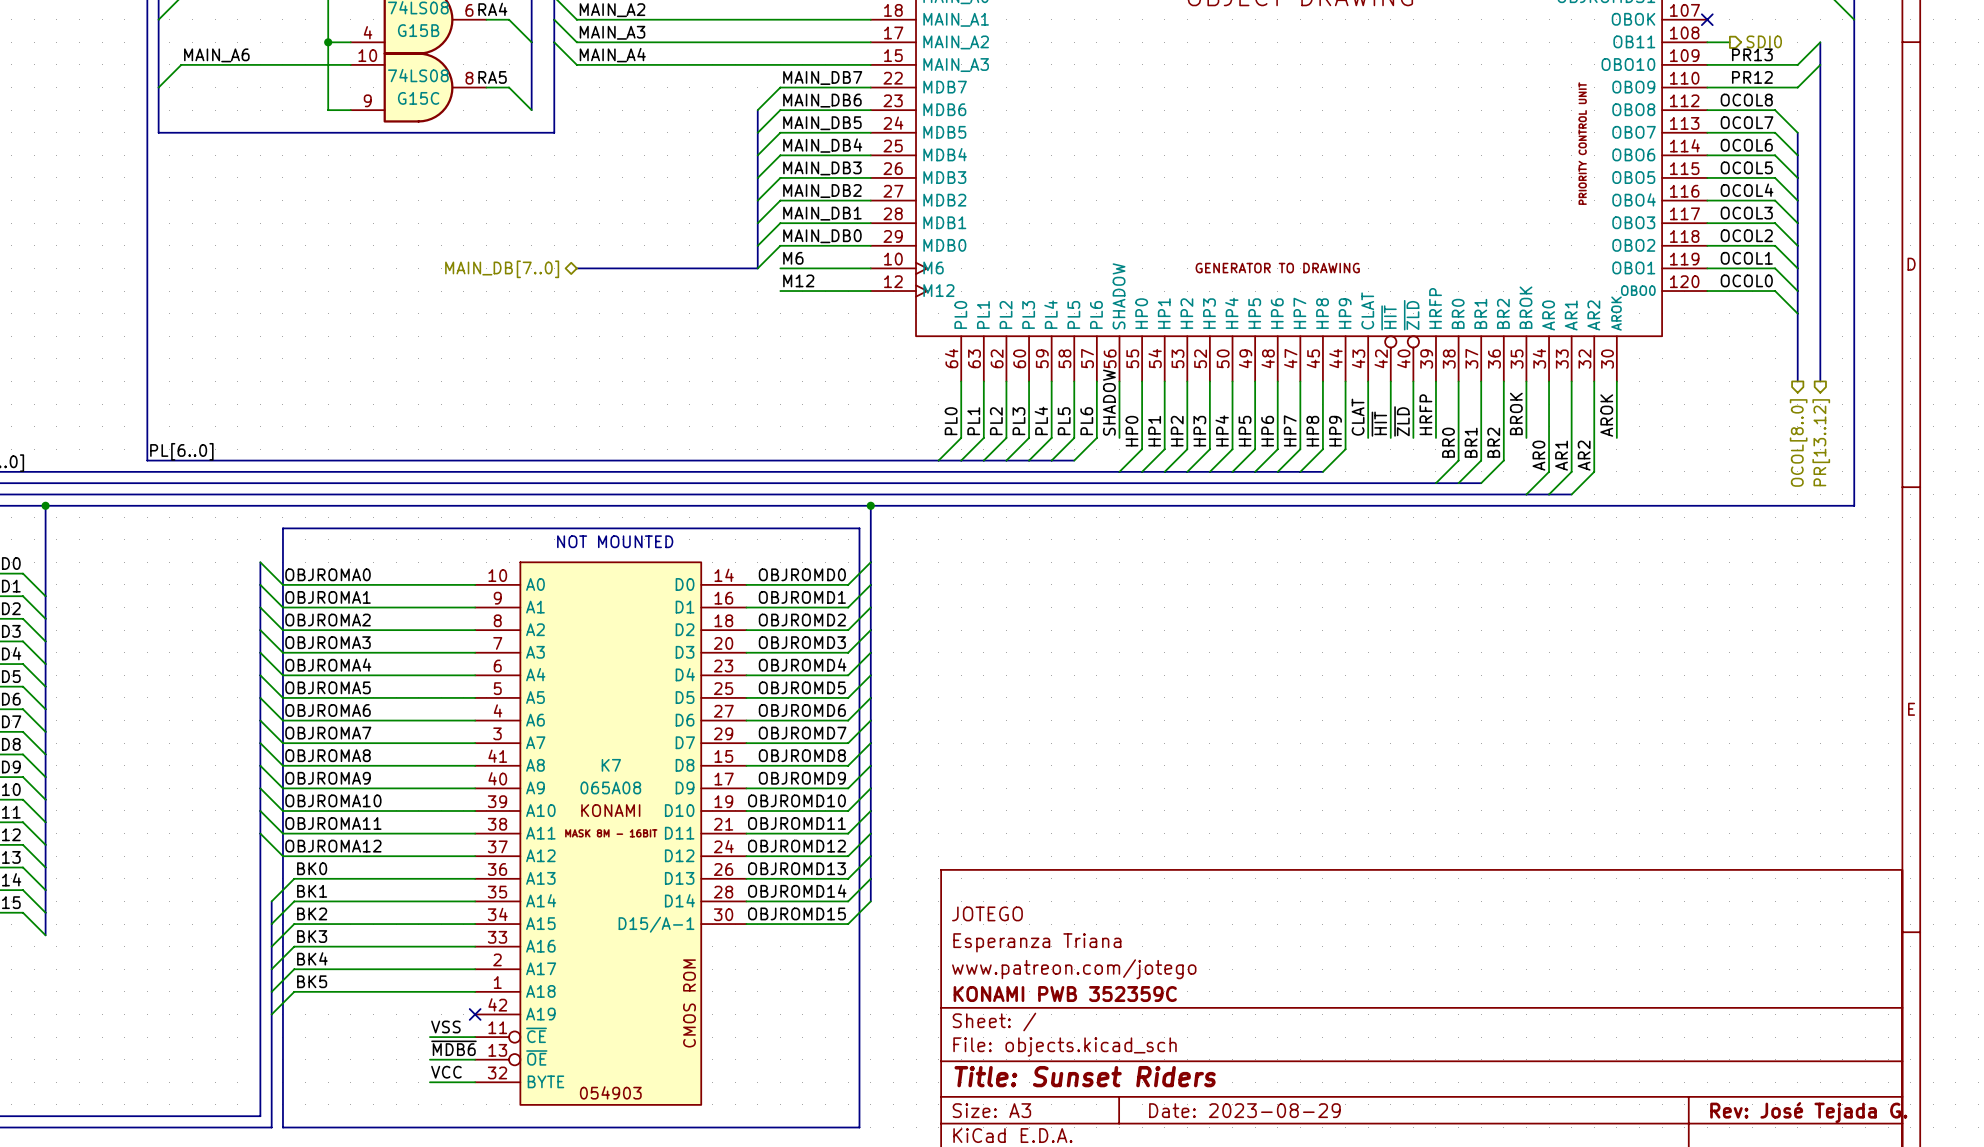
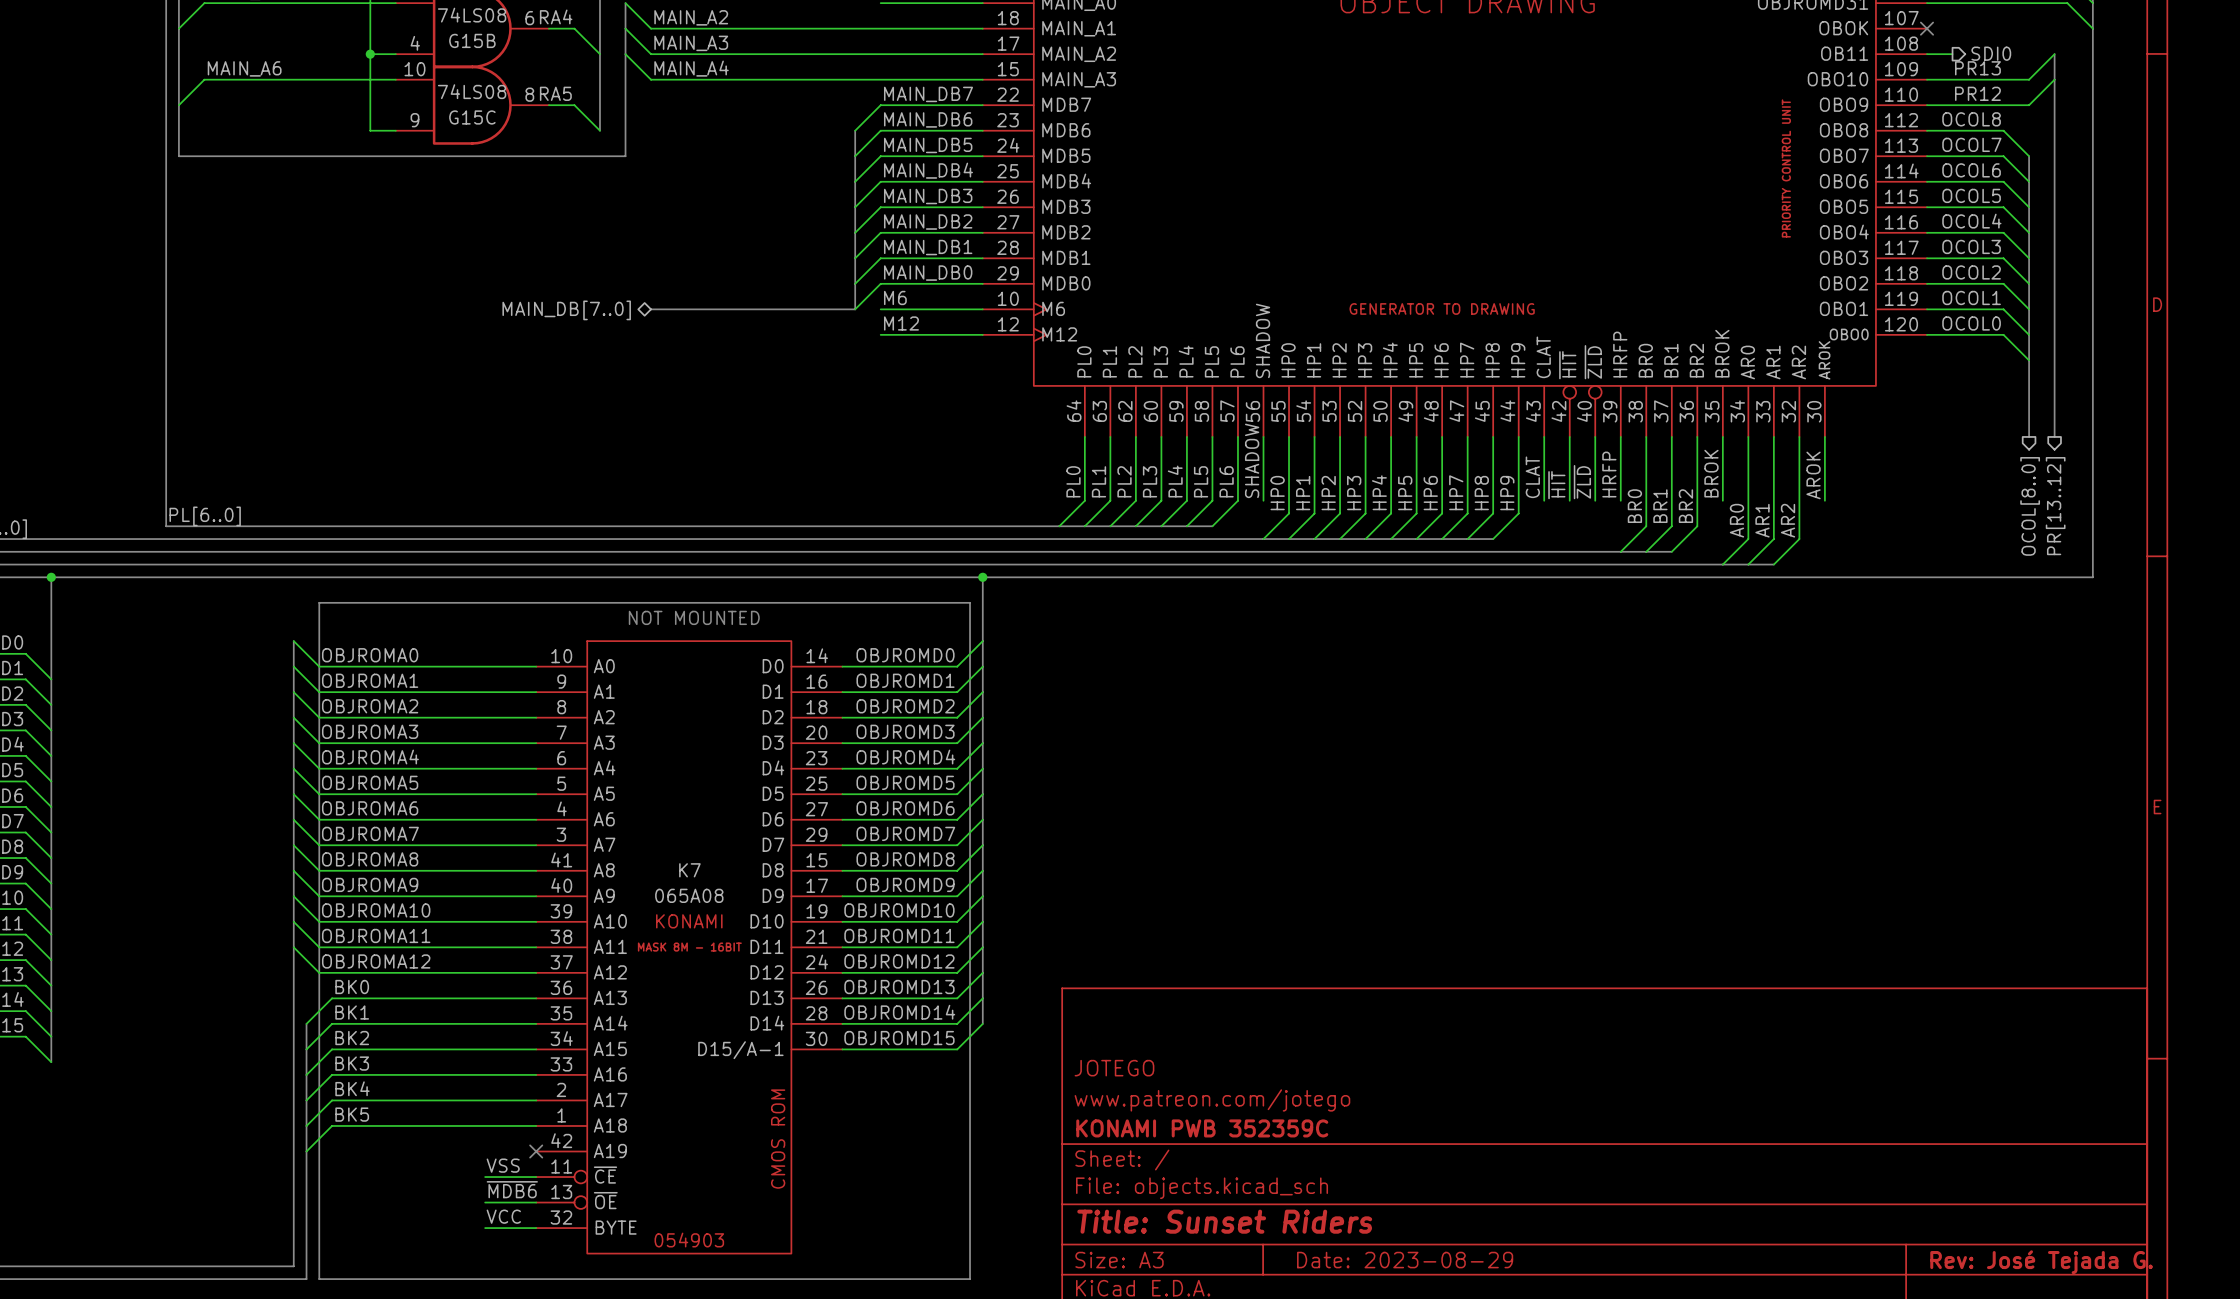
title block: JOTEGO (987, 913) -> none
title block: Esperanza Triana (1037, 942) -> JOTEGO (1114, 1068)

